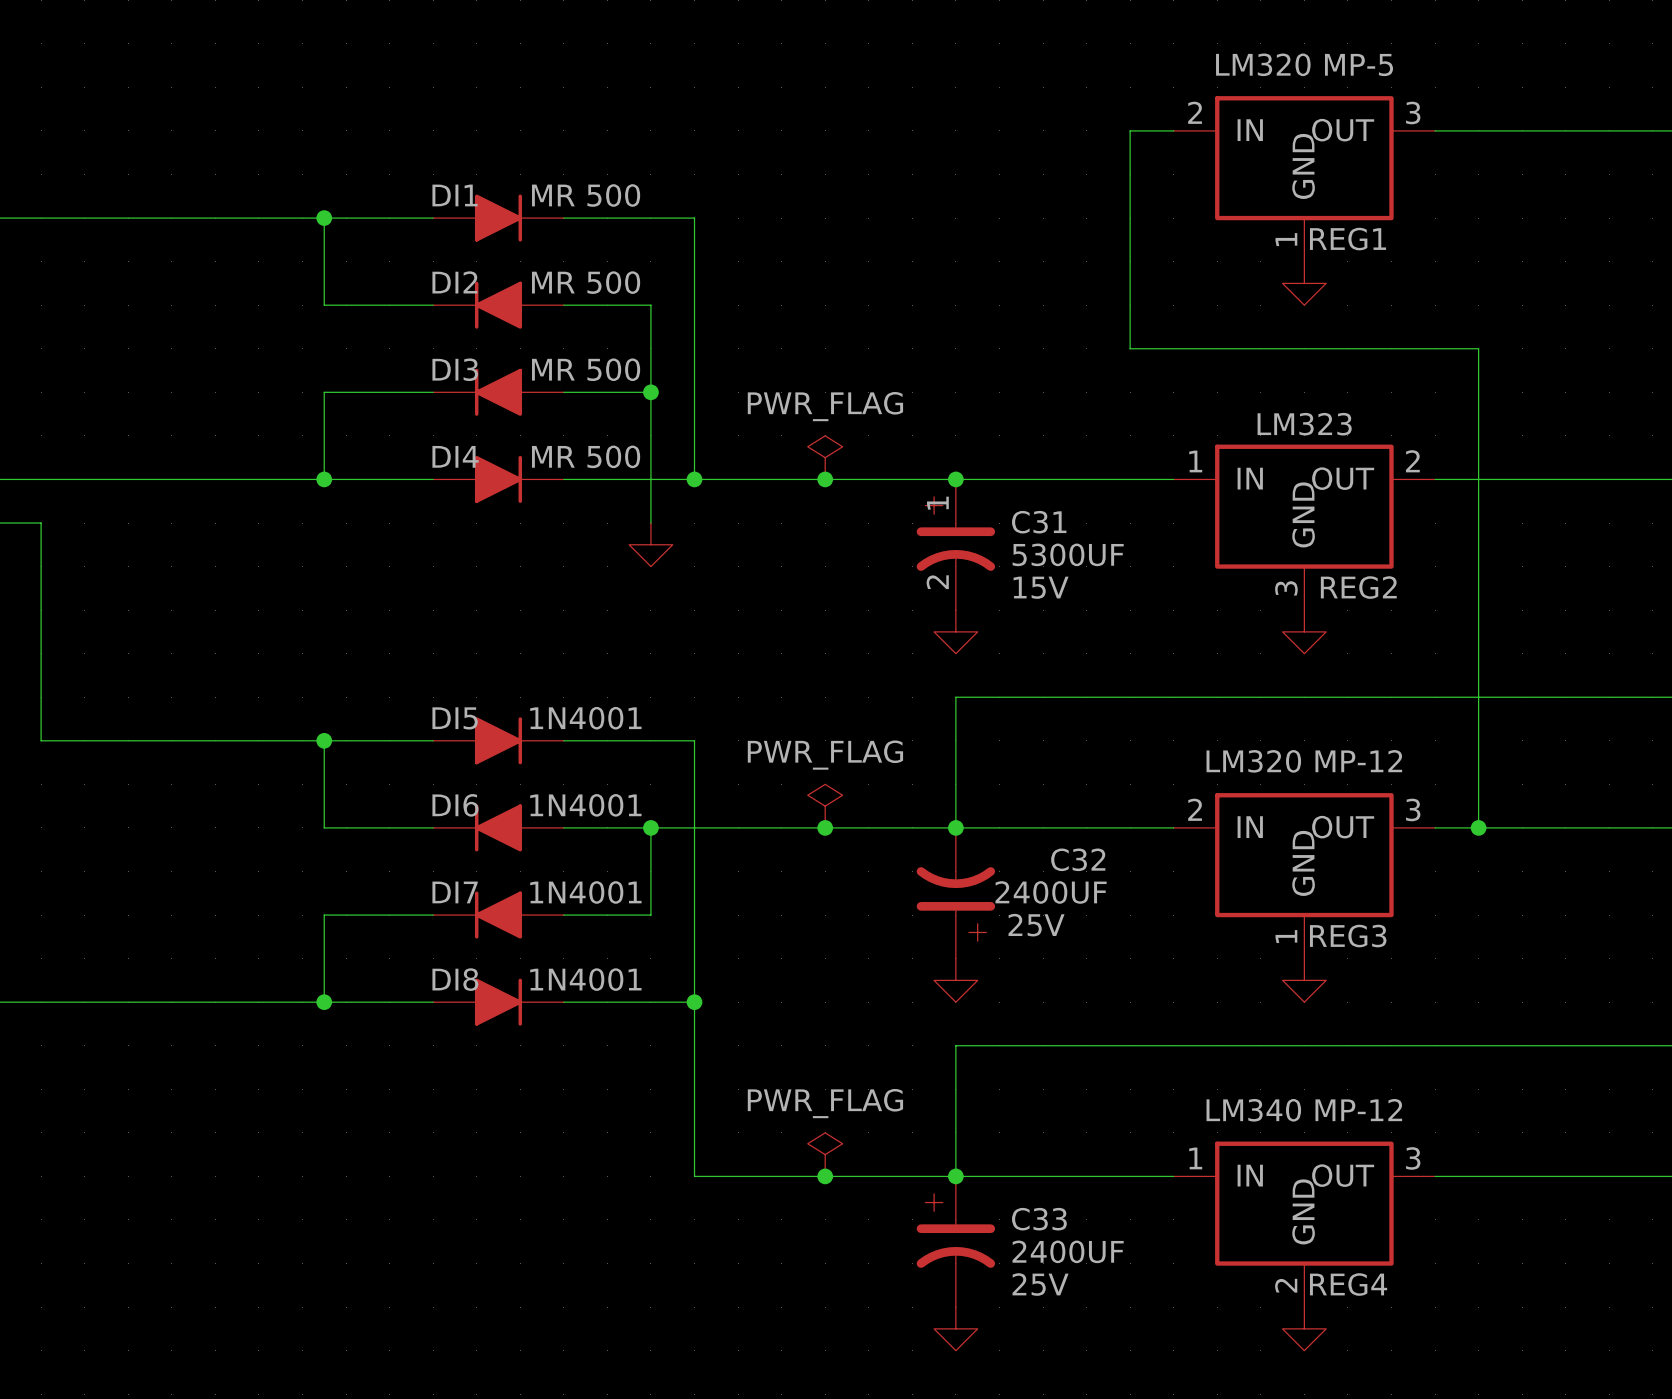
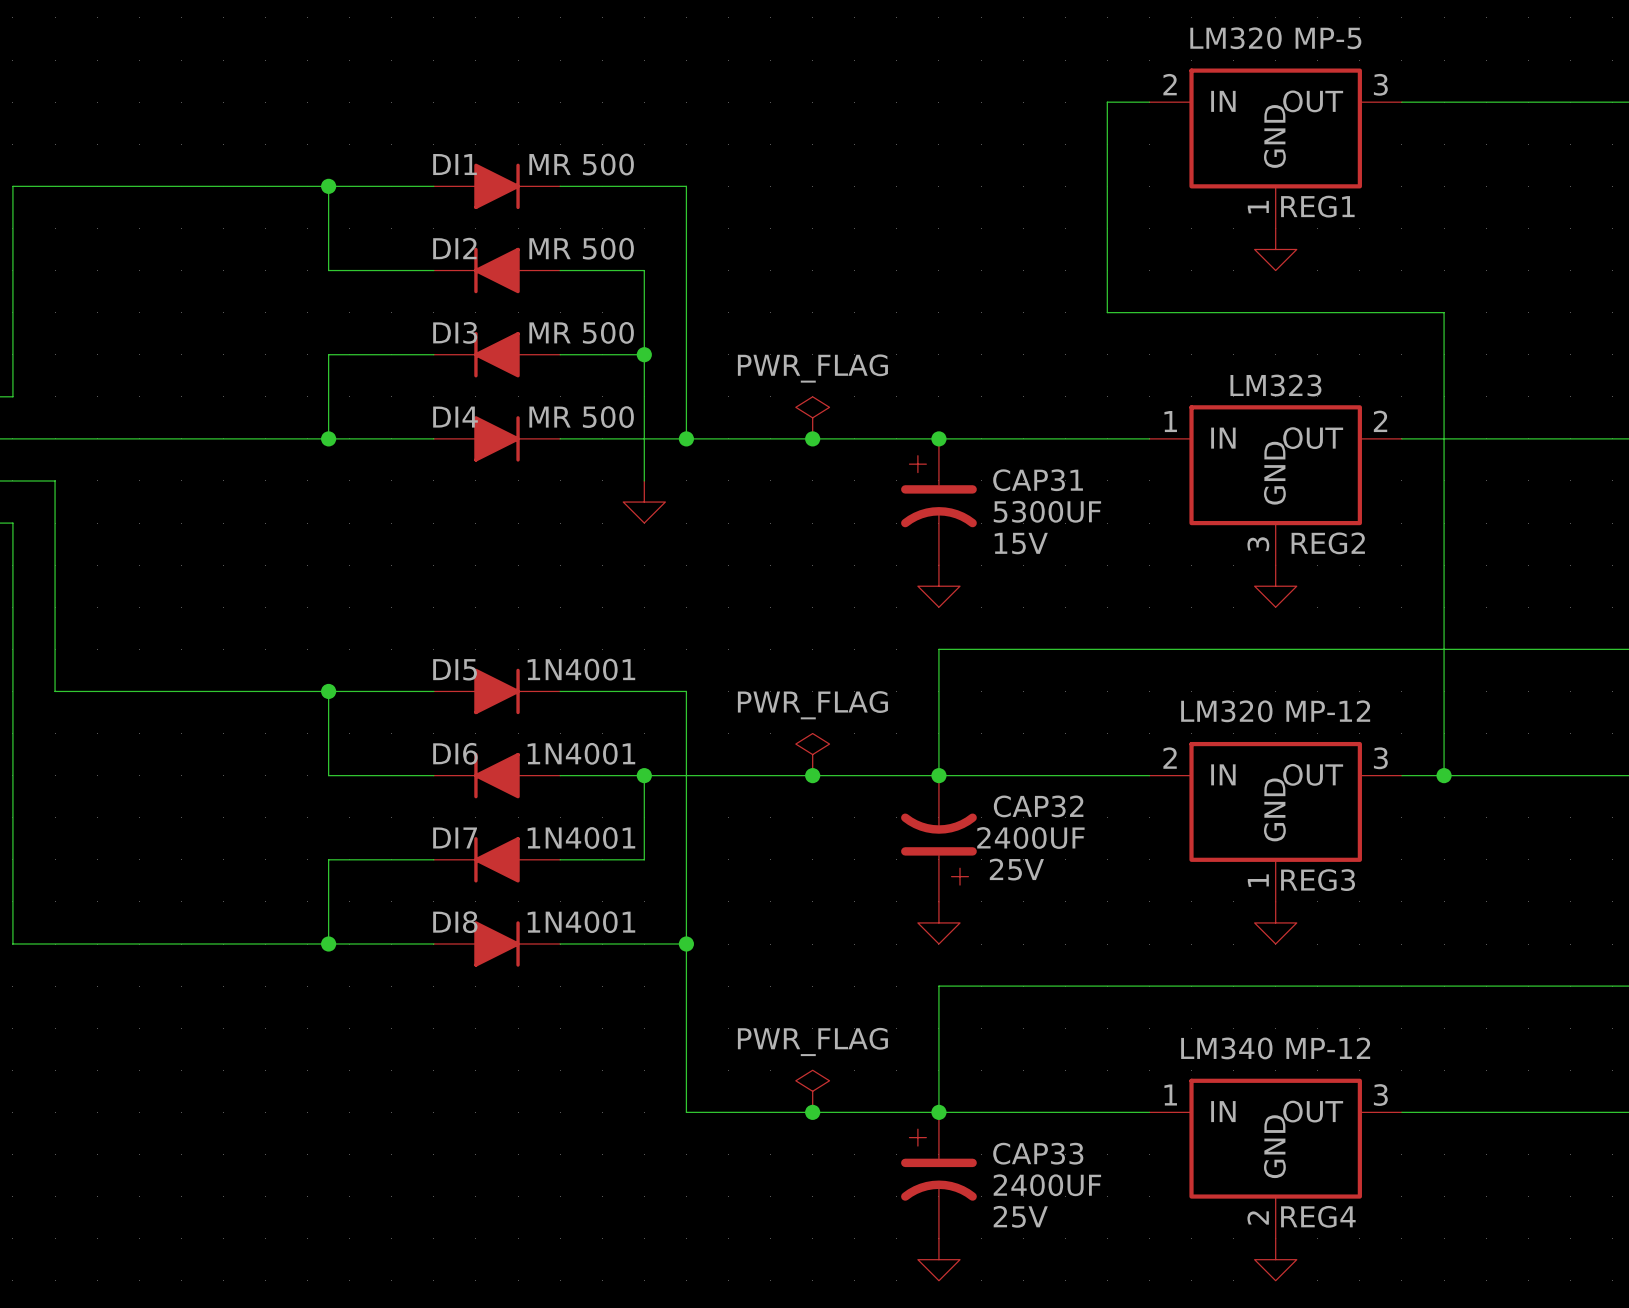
C31 pin number: 1 (937, 503) -> none
C31 name: C31 (1039, 522) -> CAP31 (1038, 480)
C31 pin number: 2 (937, 582) -> none
C32 name: C32 (1078, 859) -> CAP32 (1038, 806)
C33 name: C33 (1039, 1219) -> CAP33 (1038, 1153)

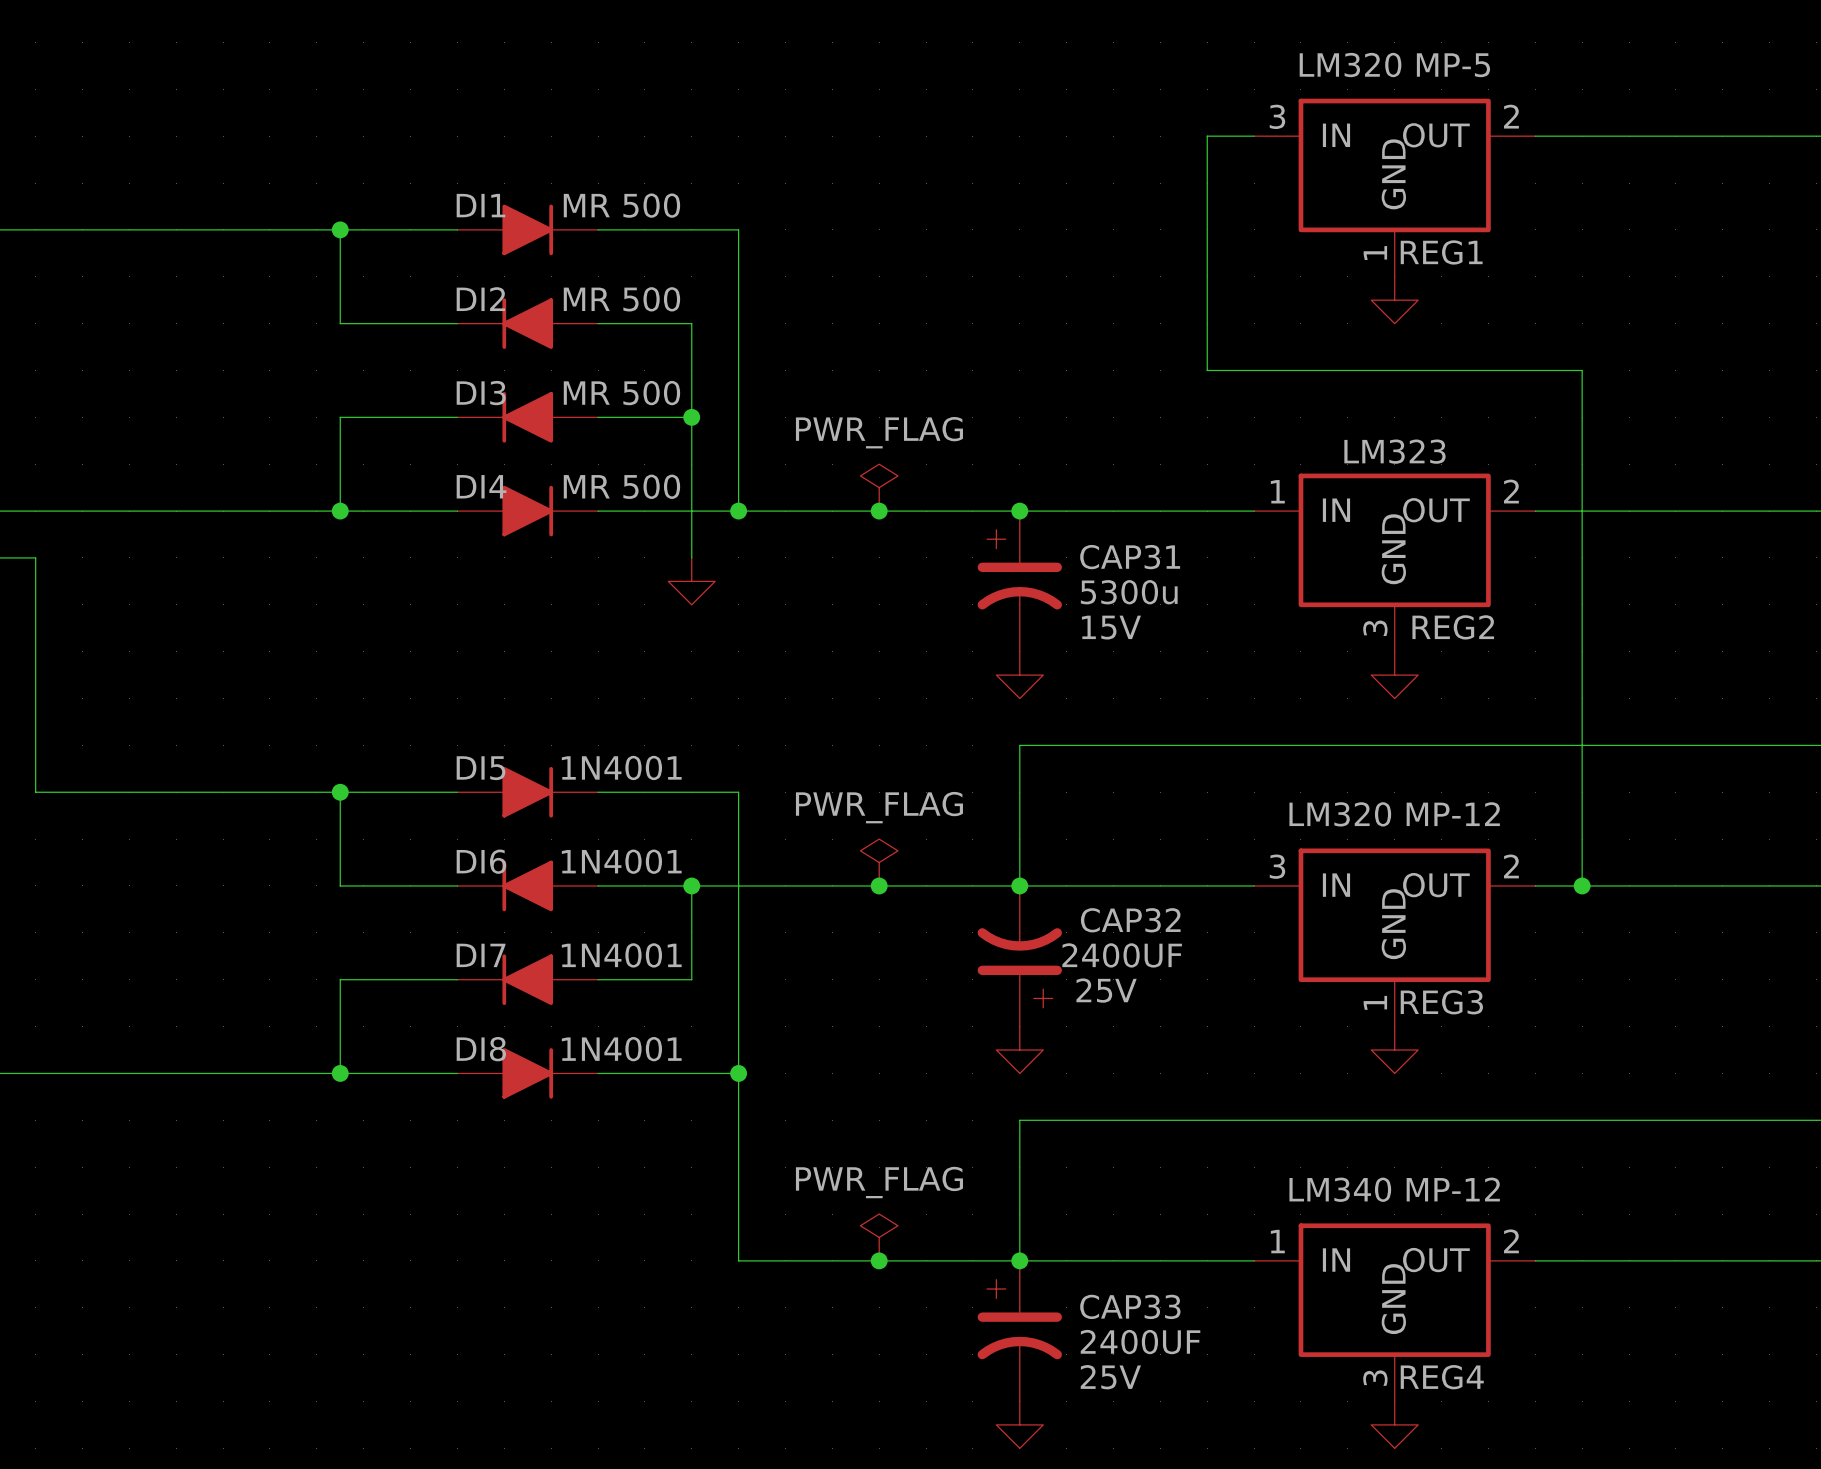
REG1 pin number: 2 (1170, 84) -> 3 (1277, 116)
REG1 pin number: 3 (1380, 84) -> 2 (1511, 116)
CAP31 value: 5300UF (1047, 511) -> 5300u (1129, 592)
REG3 pin number: 2 (1170, 758) -> 3 (1277, 866)
REG3 pin number: 3 (1380, 758) -> 2 (1511, 866)
REG4 pin number: 3 (1380, 1095) -> 2 (1511, 1241)
REG4 pin number: 2 (1258, 1217) -> 3 (1375, 1378)

